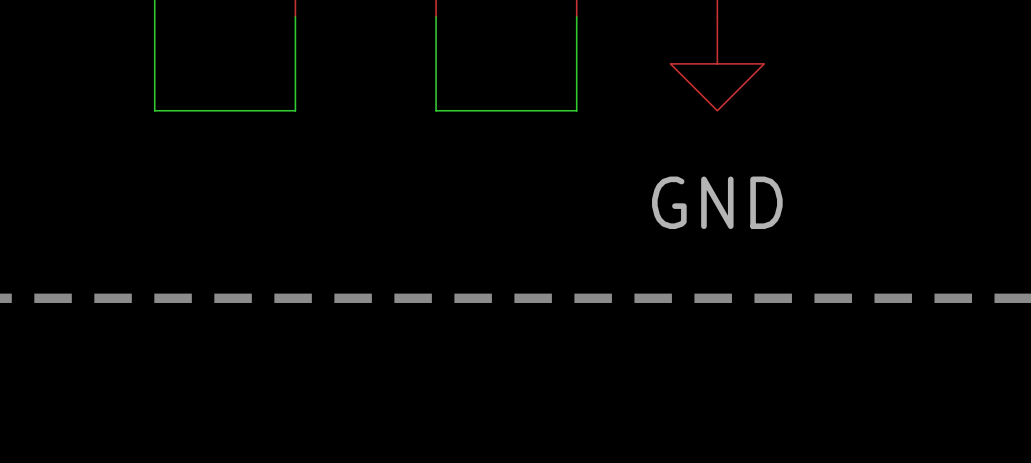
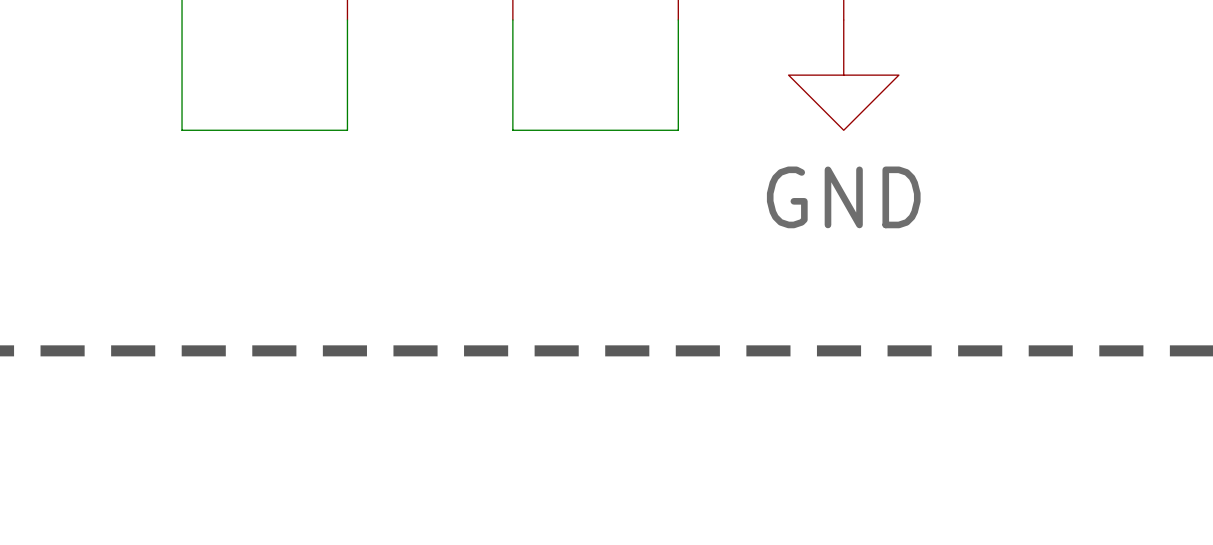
power symbol text position: GND (717, 202) -> GND (843, 197)

